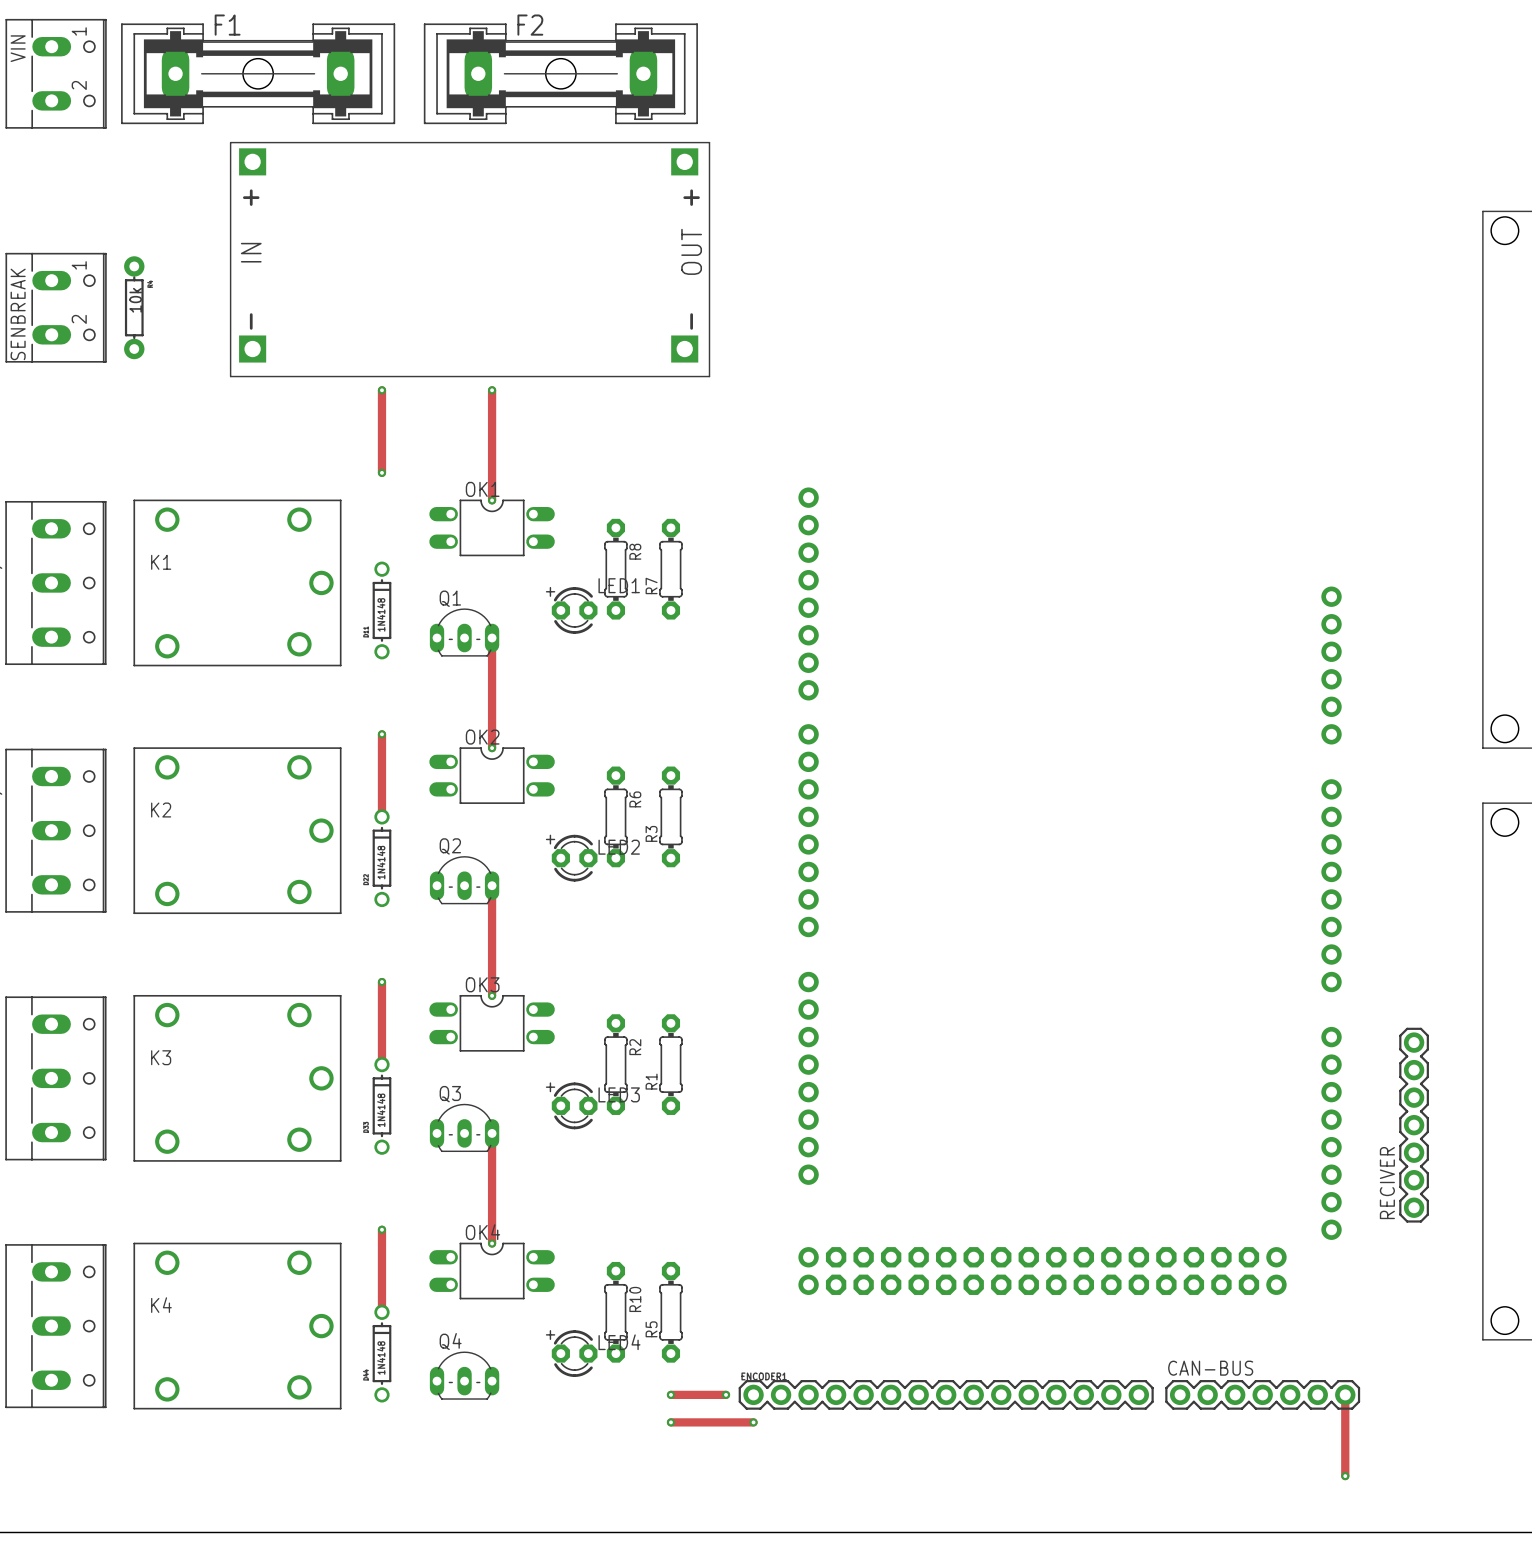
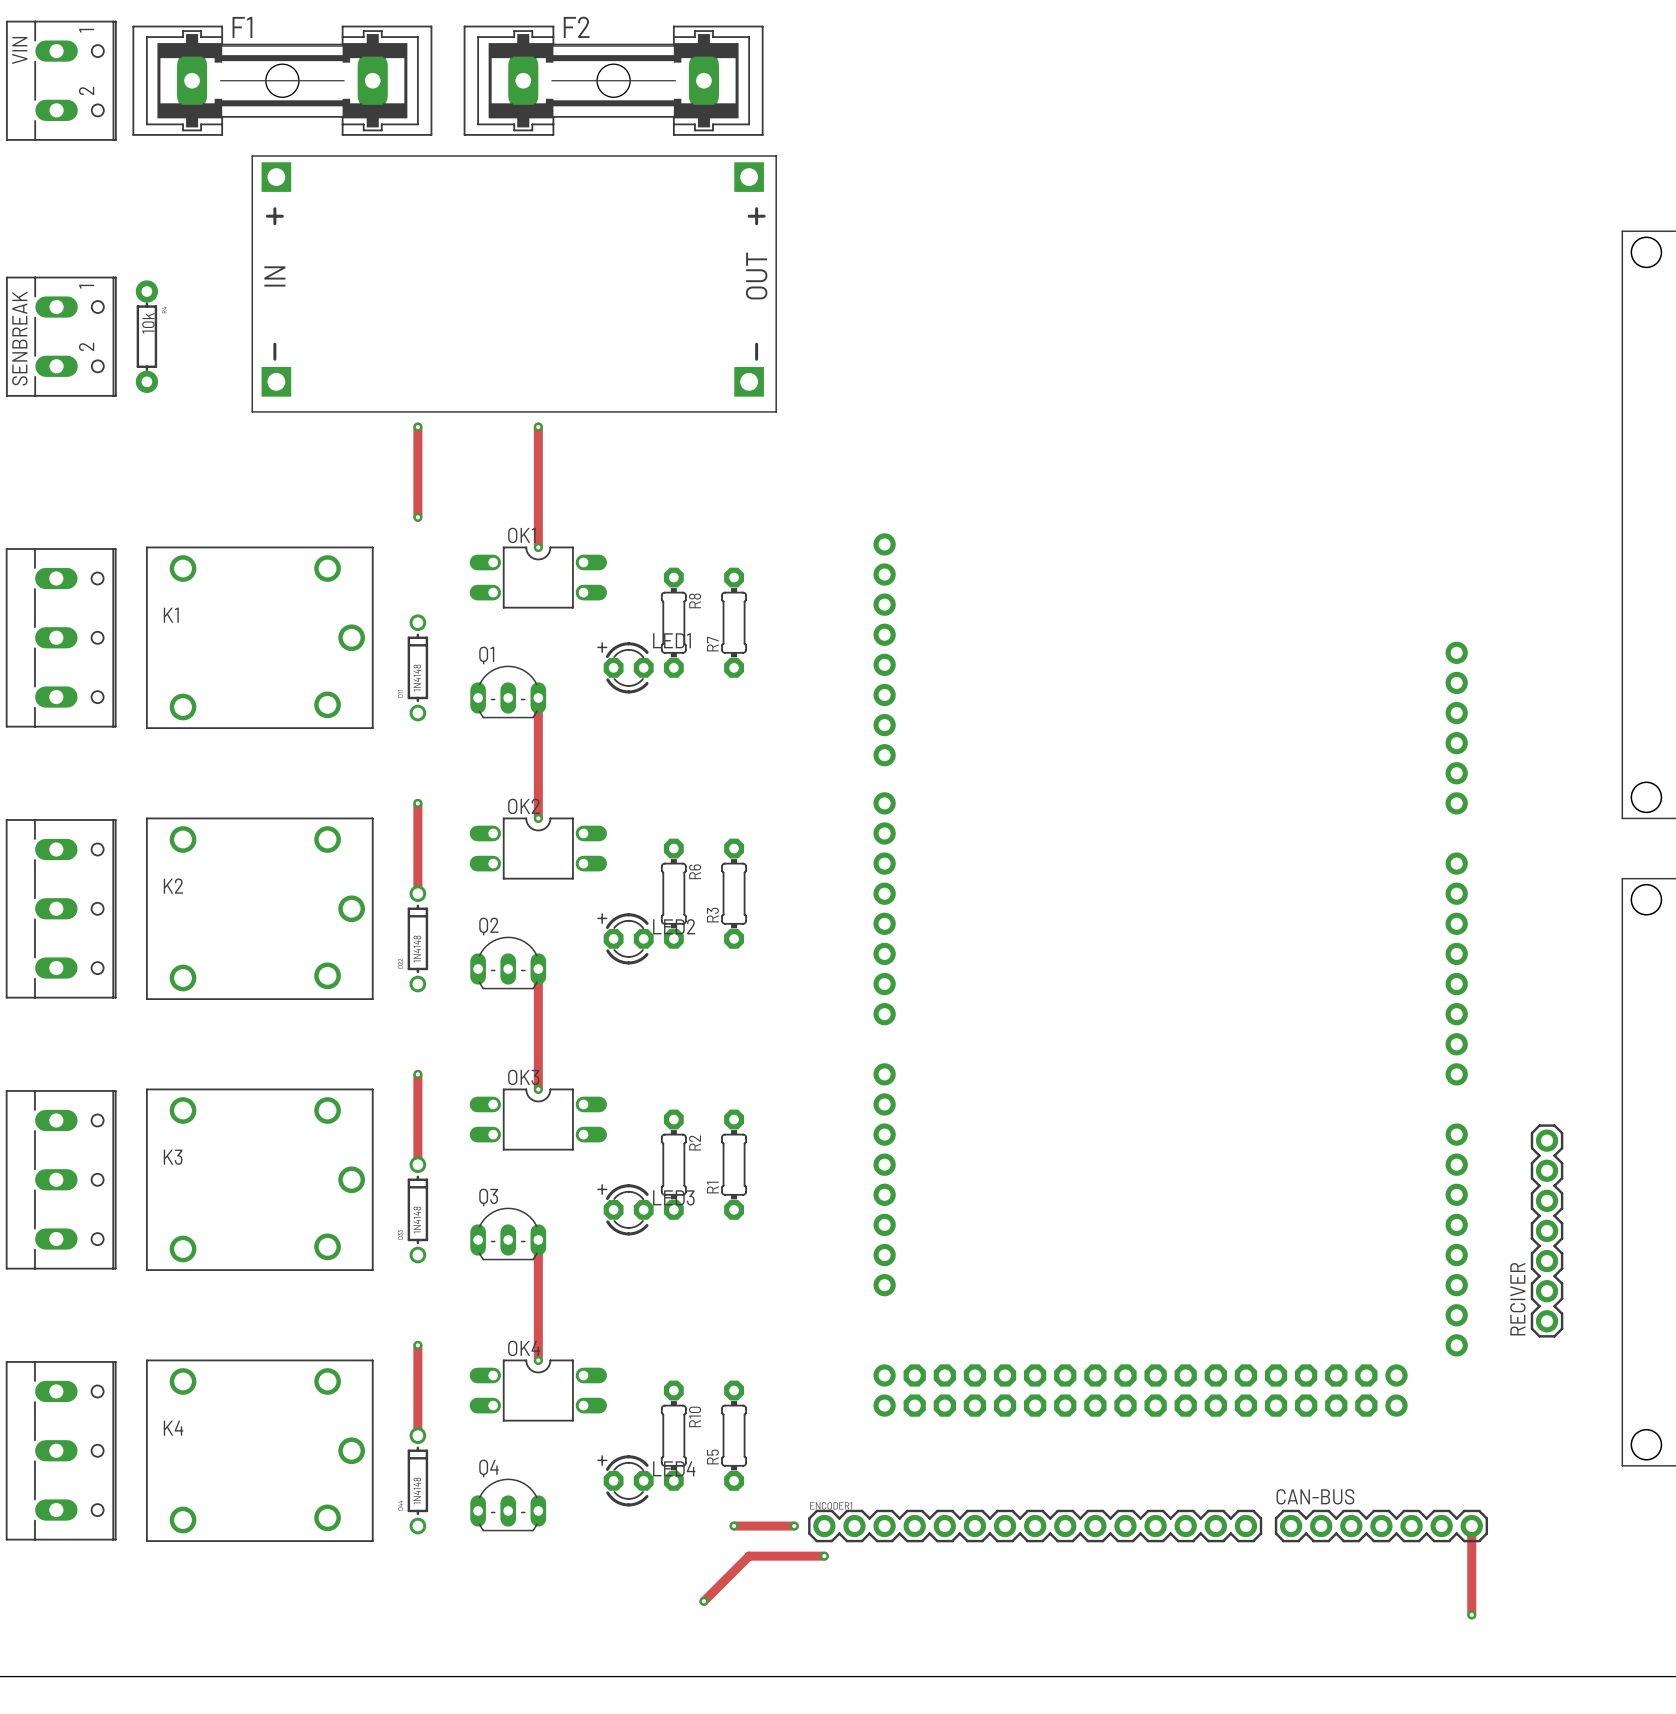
track: (670, 1422) (684, 1422) -> (703, 1601) (749, 1556)
via position: (670, 1422) -> (703, 1601)

